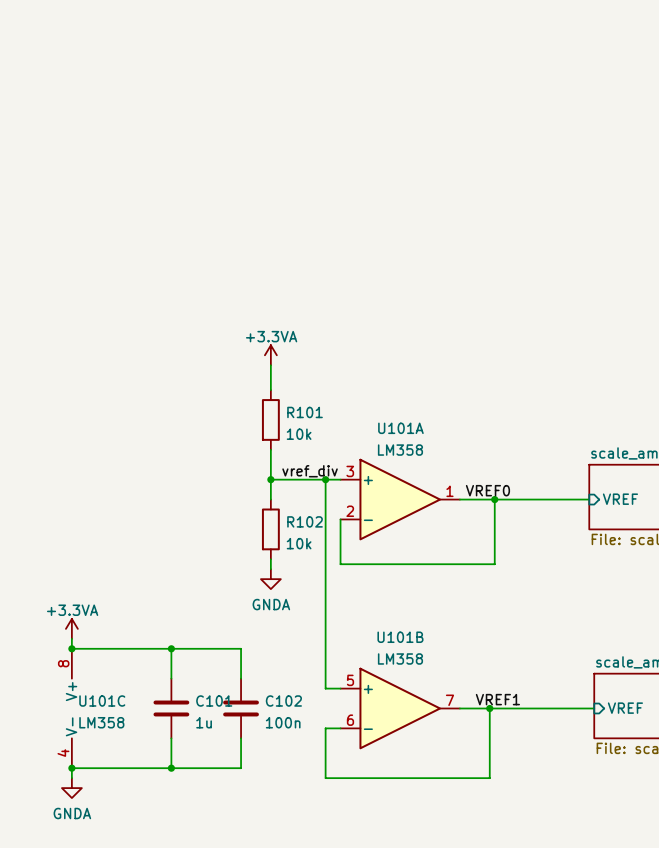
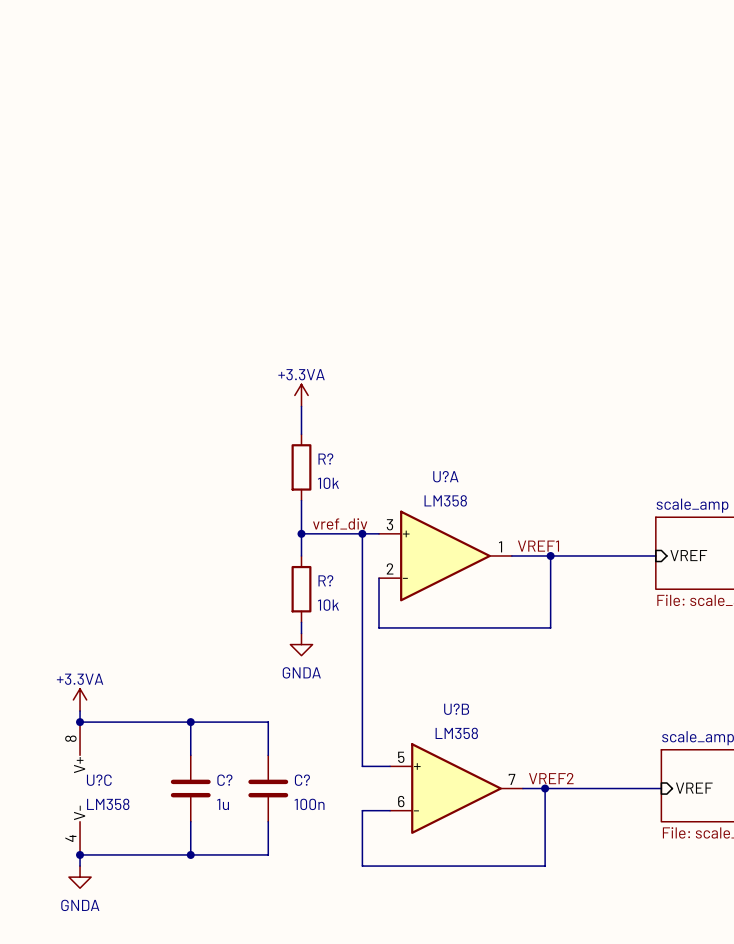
R101 name: R101 (305, 412) -> R? (325, 459)
U101A name: U101A (400, 428) -> U?A (445, 476)
label: VREF0 (487, 490) -> VREF1 (538, 546)
R102 name: R102 (305, 521) -> R? (325, 580)
label: VREF1 (497, 699) -> VREF2 (551, 778)
U101C name: U101C (102, 701) -> U?C (99, 780)
C101 name: C101 (214, 701) -> C? (224, 780)
C102 name: C102 (283, 701) -> C? (302, 780)
U101B: LM358 (400, 708) -> none
U?B: none -> LM358 (456, 788)

